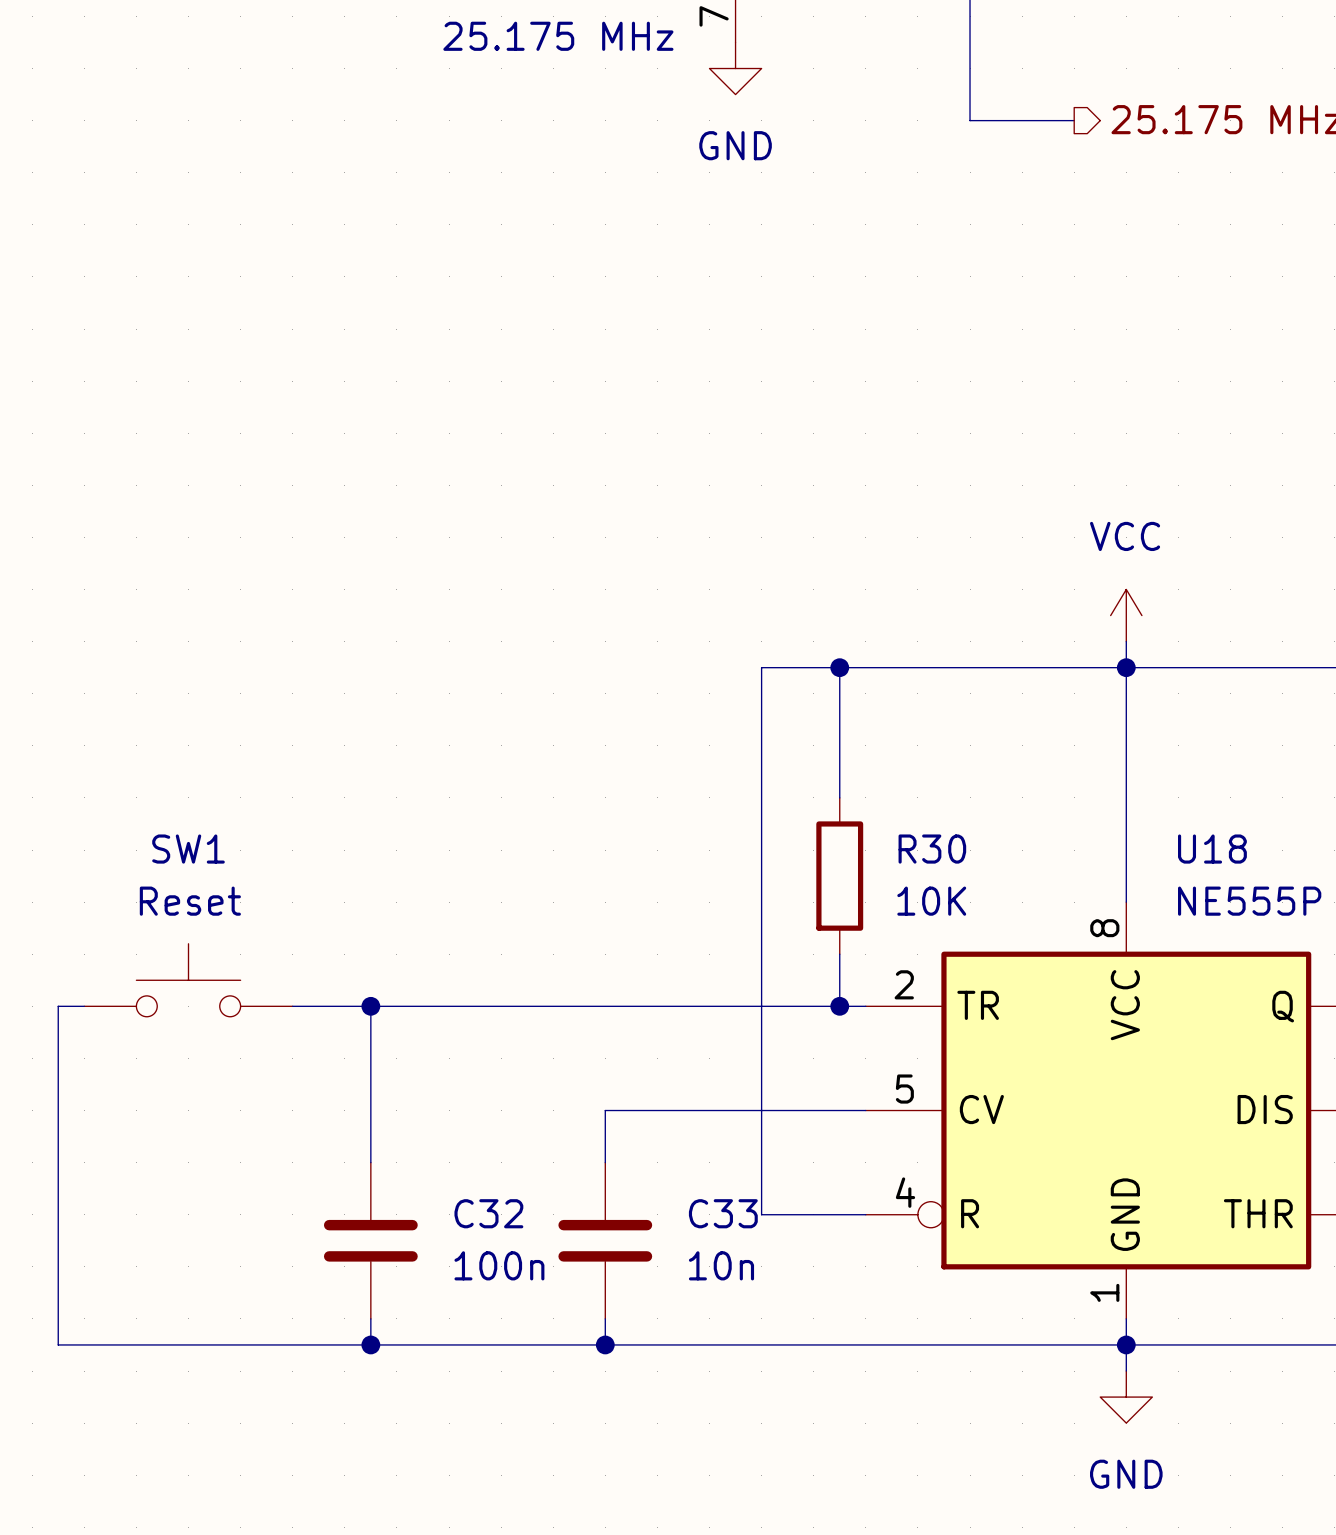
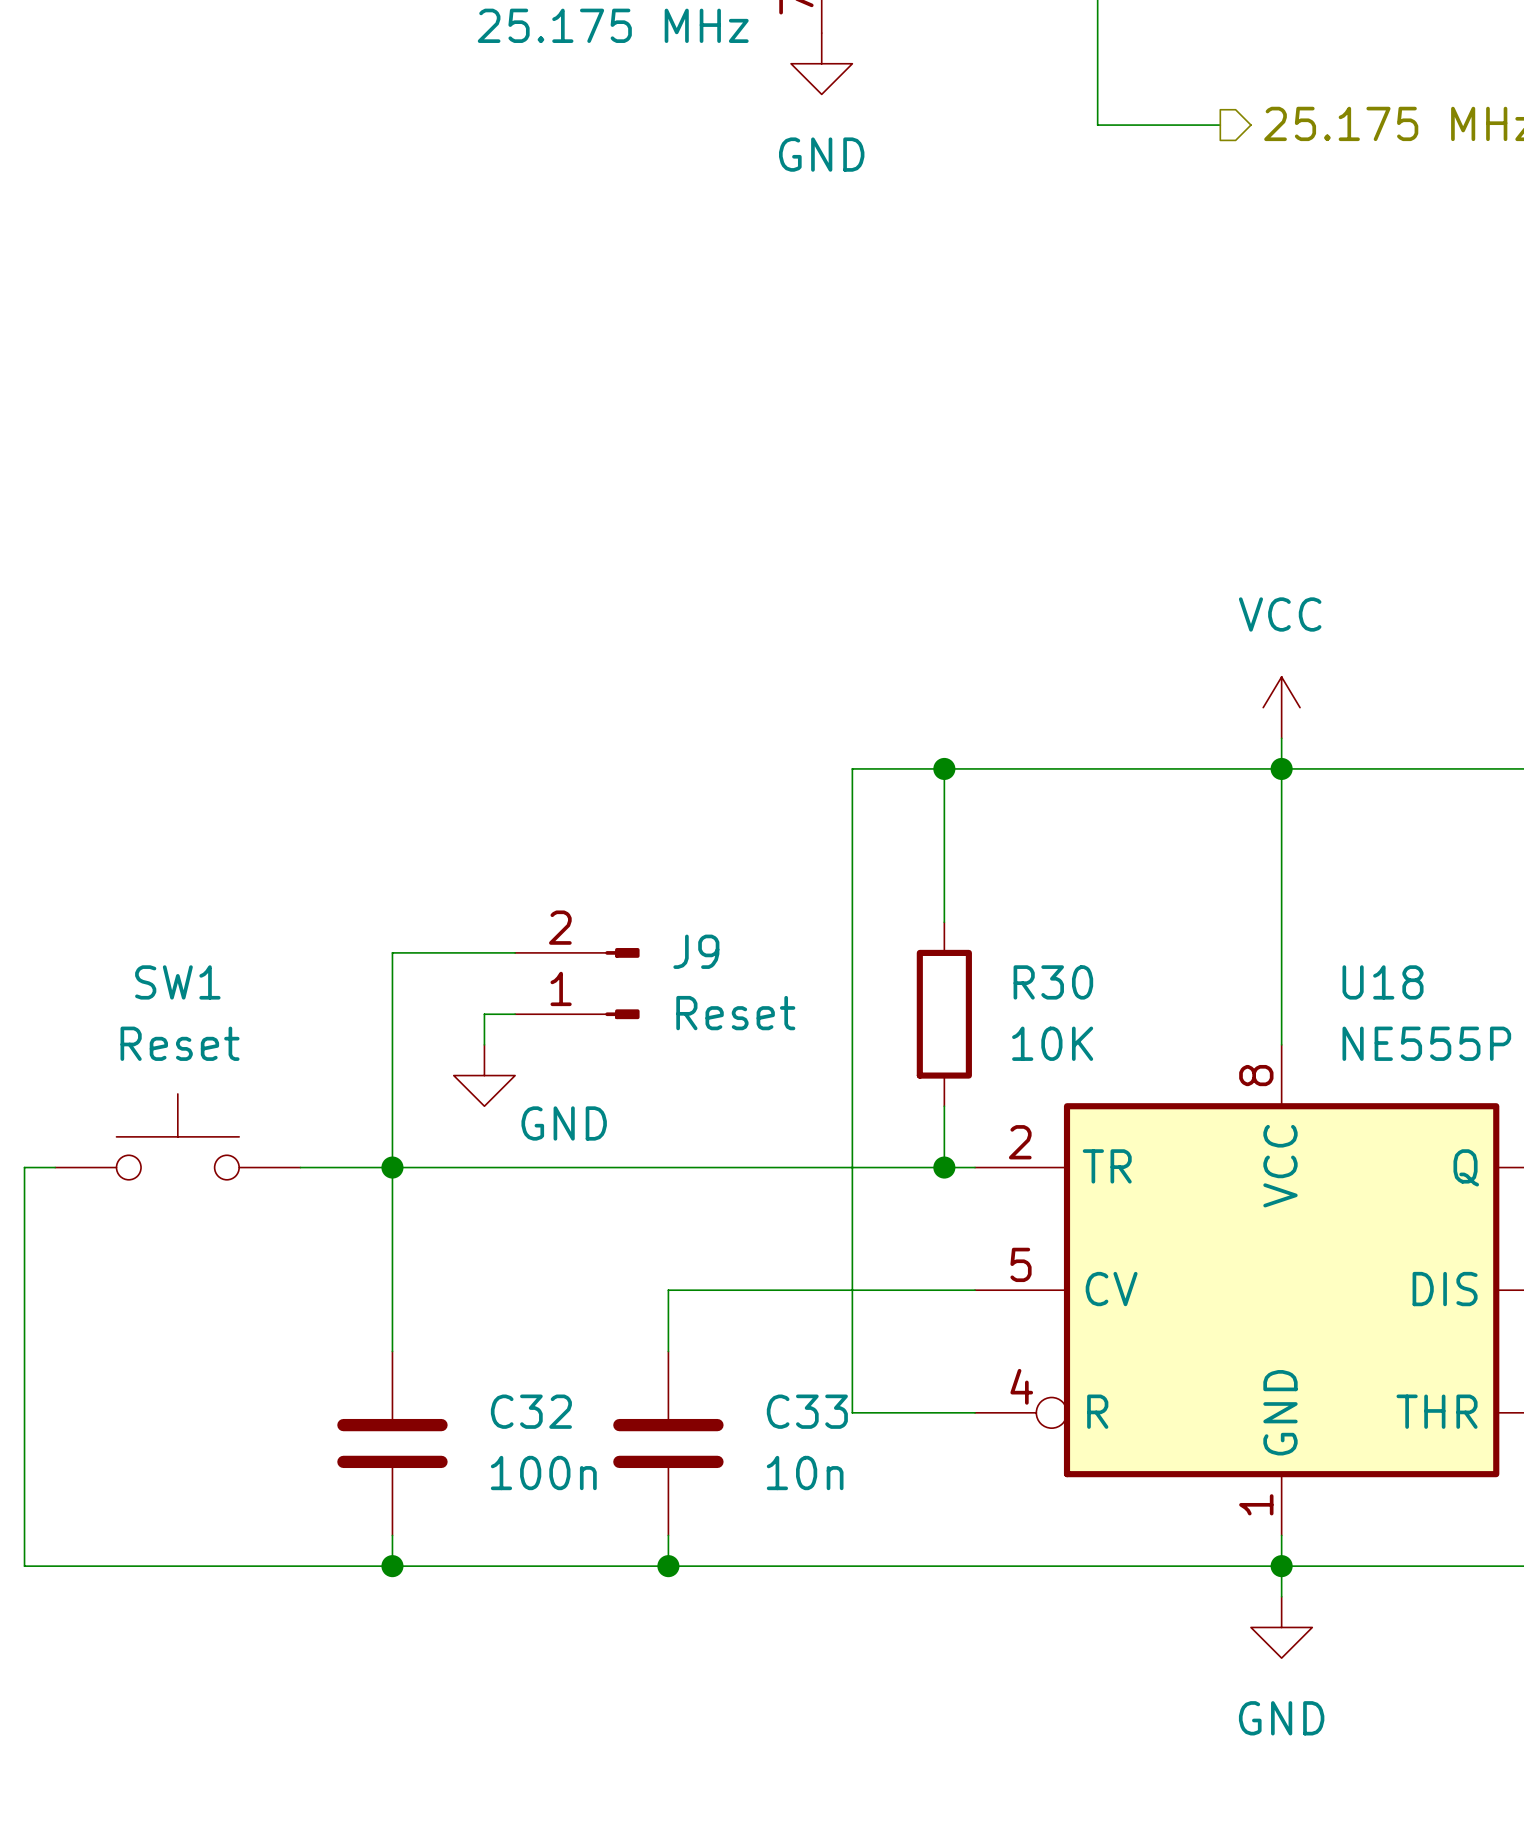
wire: none -> (515, 952) (392, 952) (392, 1167)
J9: none -> Reset (577, 983)
wire: none -> (515, 1014) (484, 1014) (484, 1044)
power symbol: none -> GND (484, 1075)

